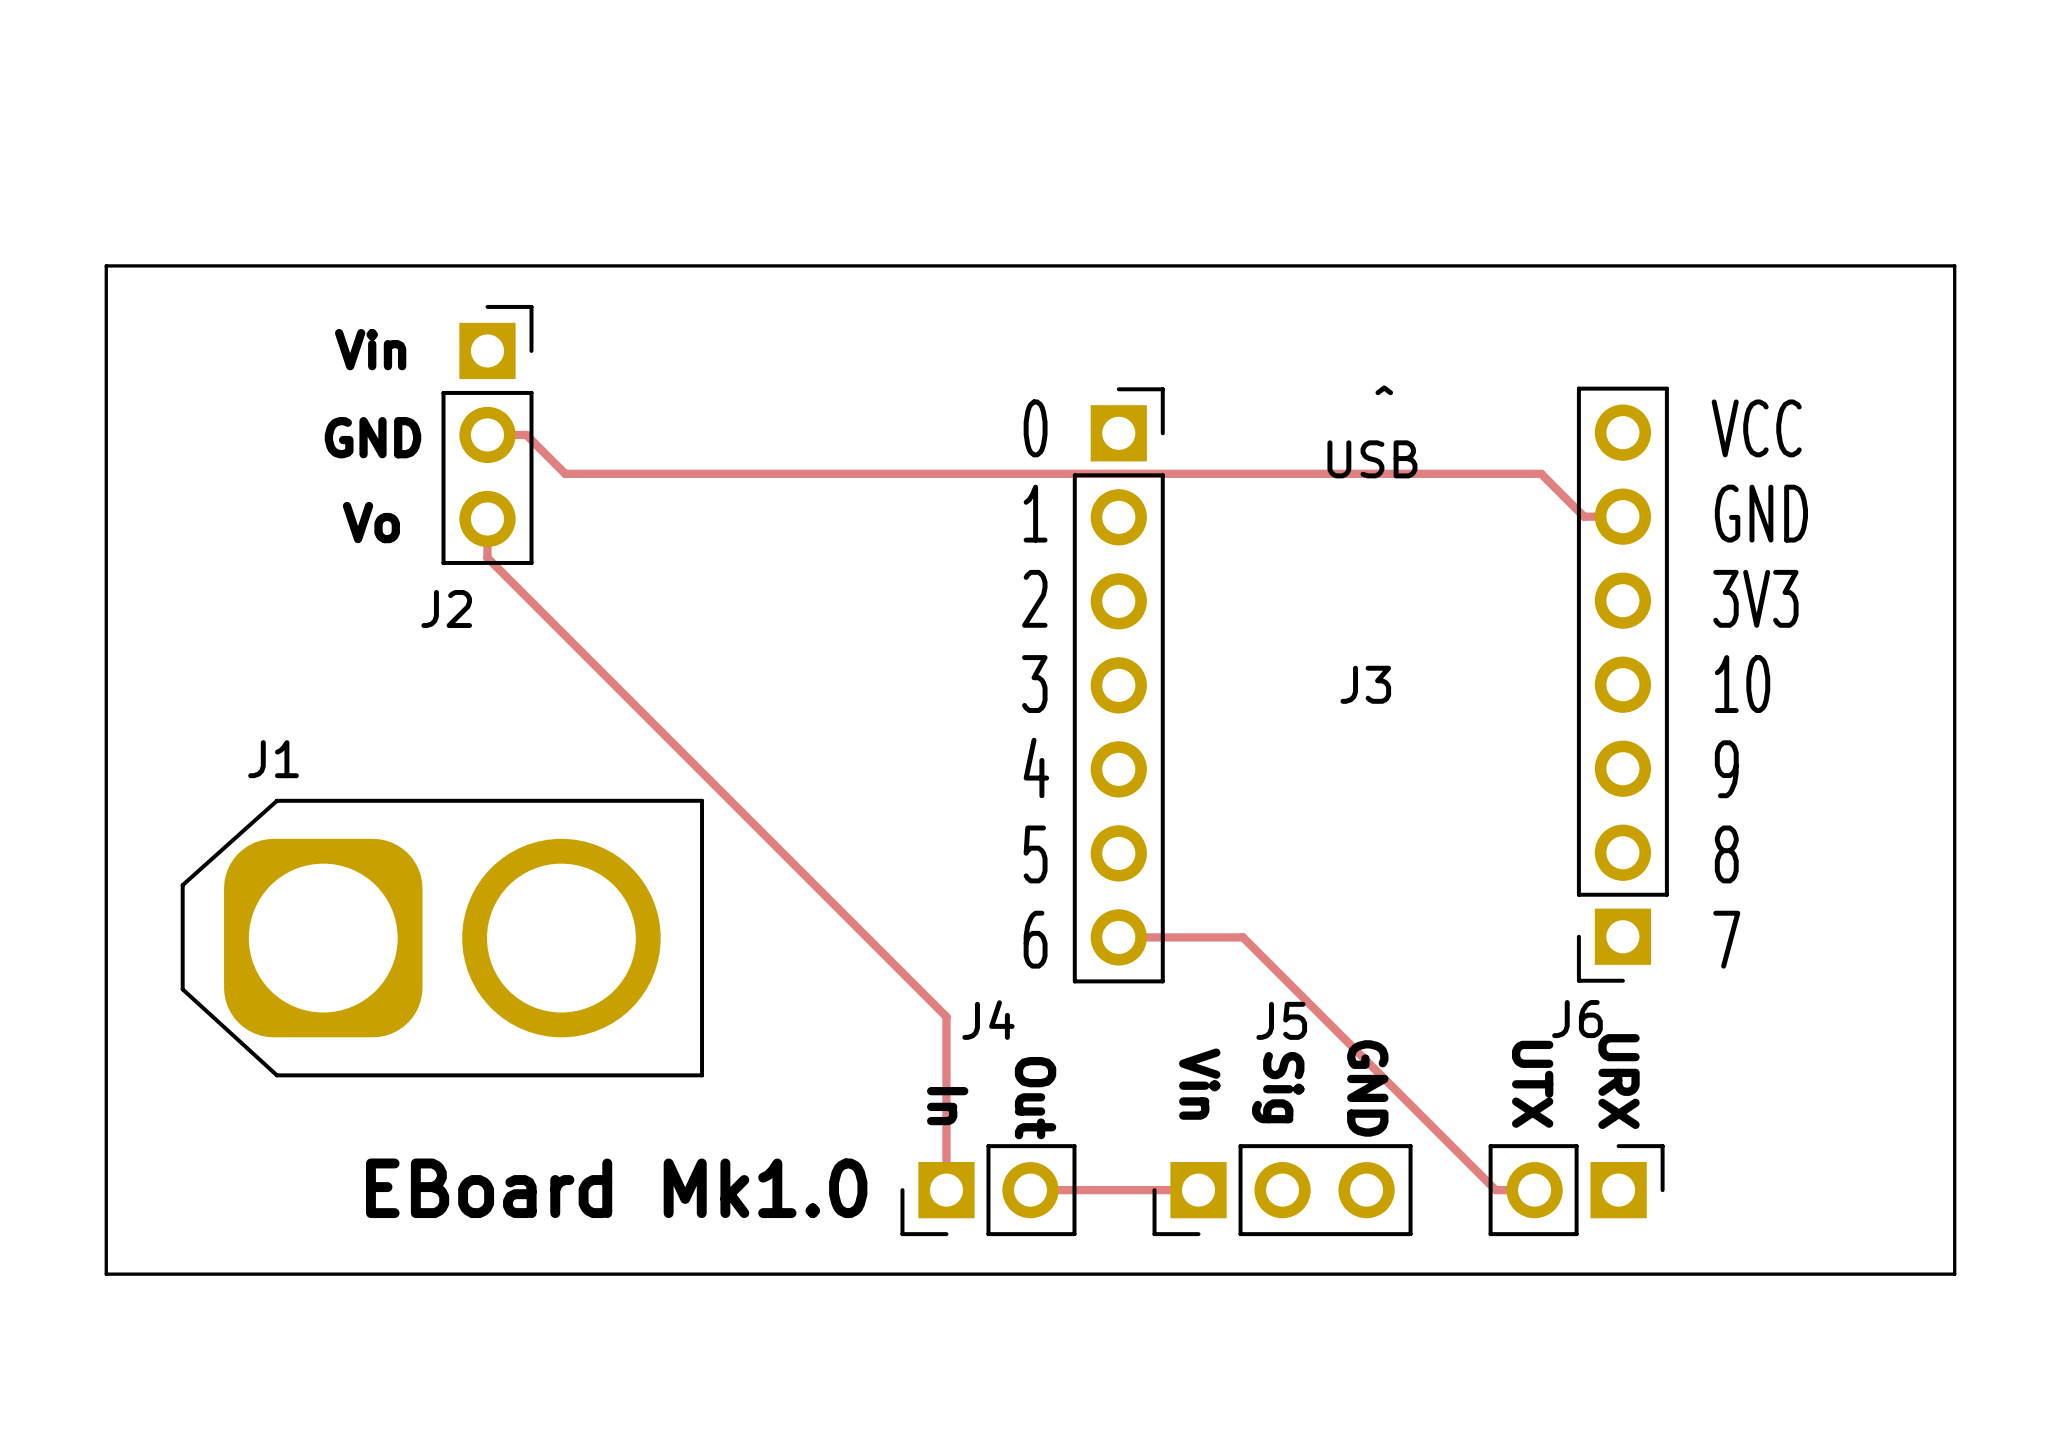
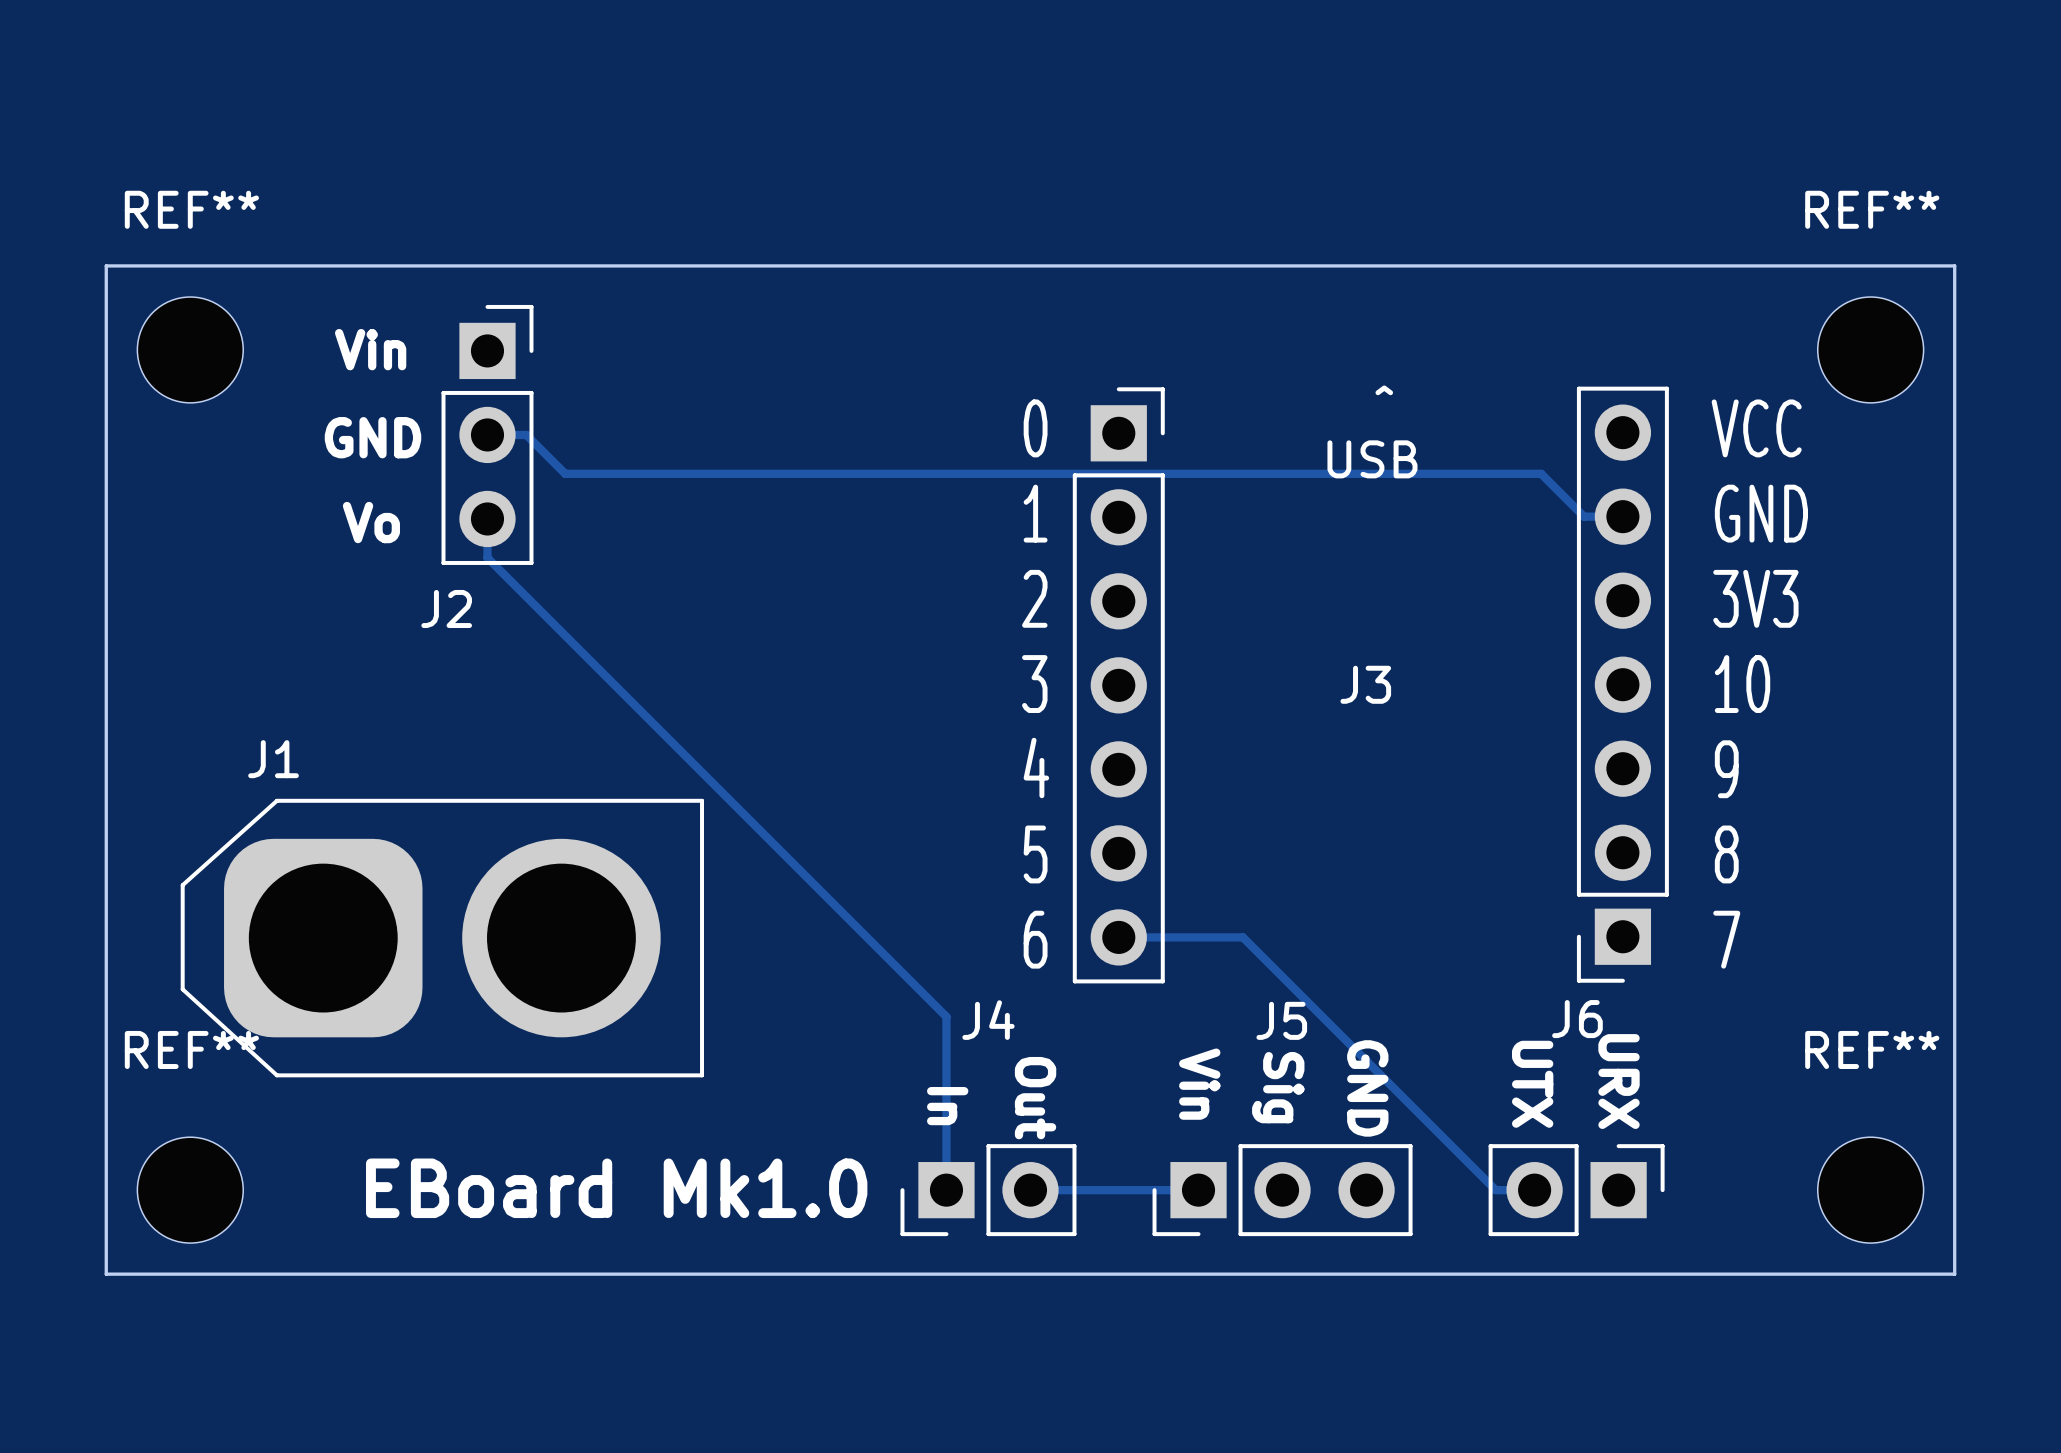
REF**: none -> (190, 349)
REF**: none -> (1870, 349)
REF**: none -> (190, 1190)
REF**: none -> (1870, 1190)

